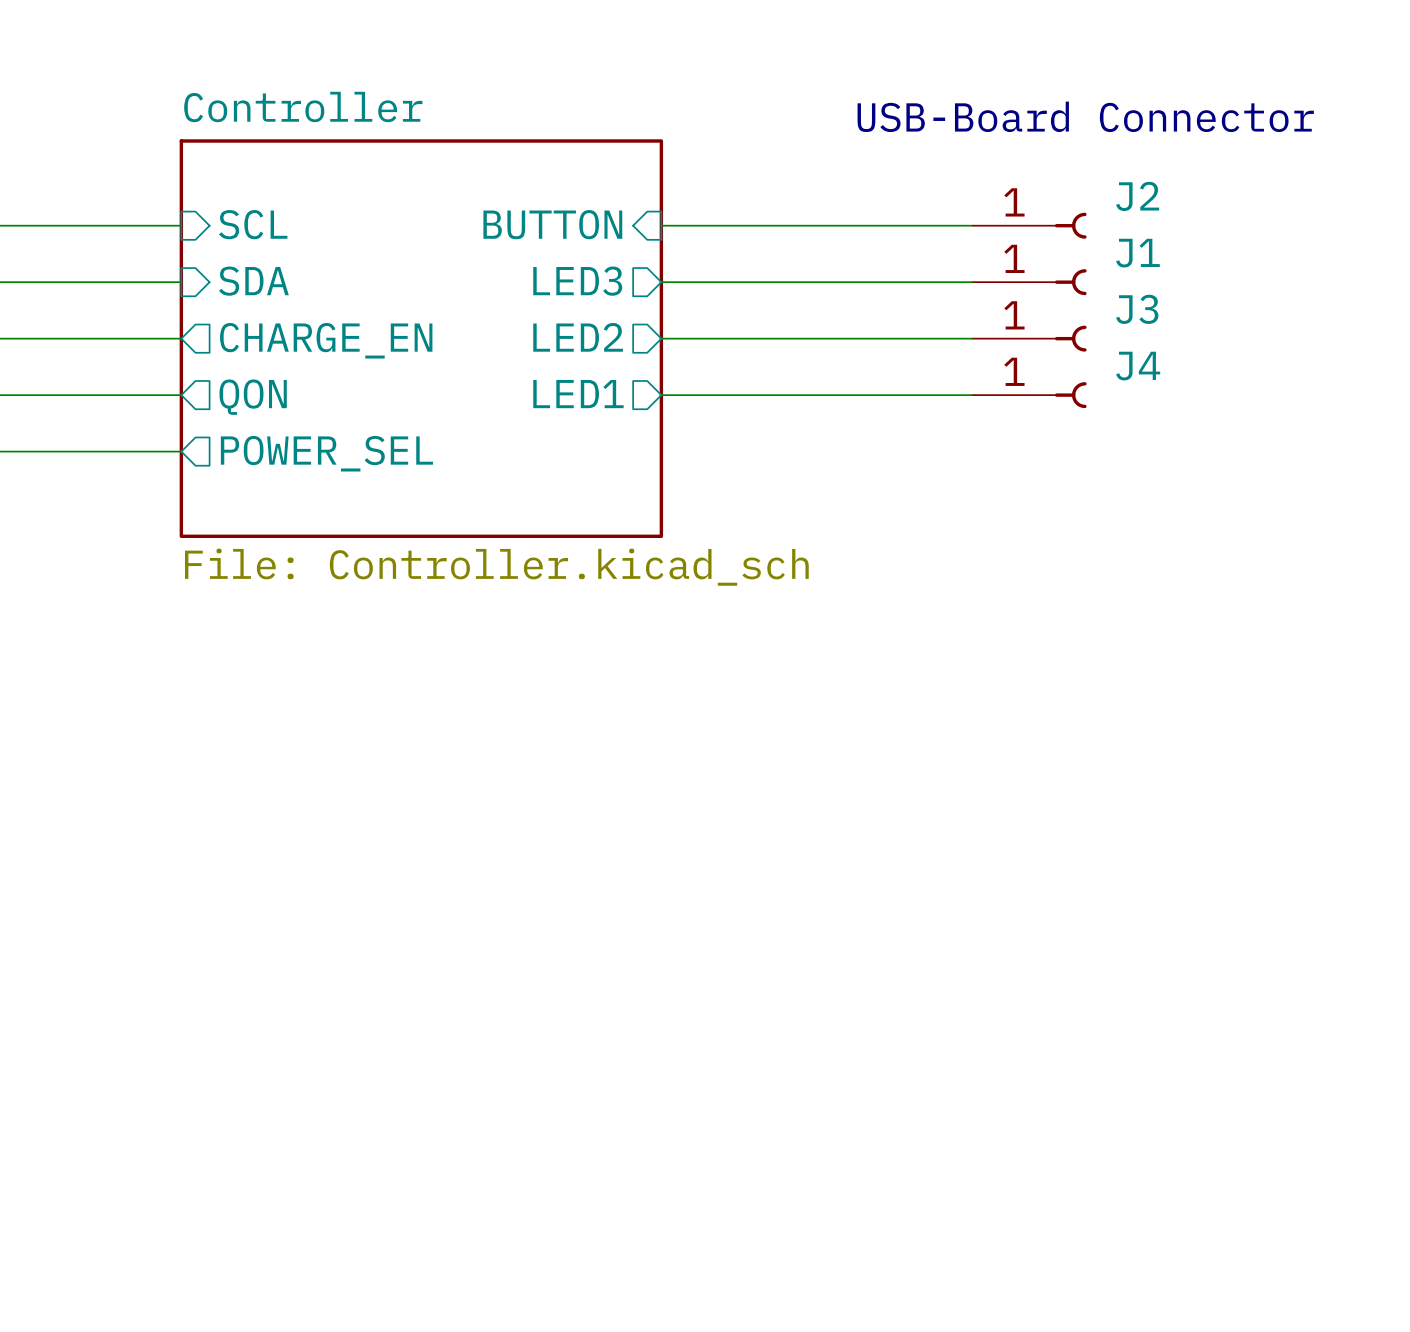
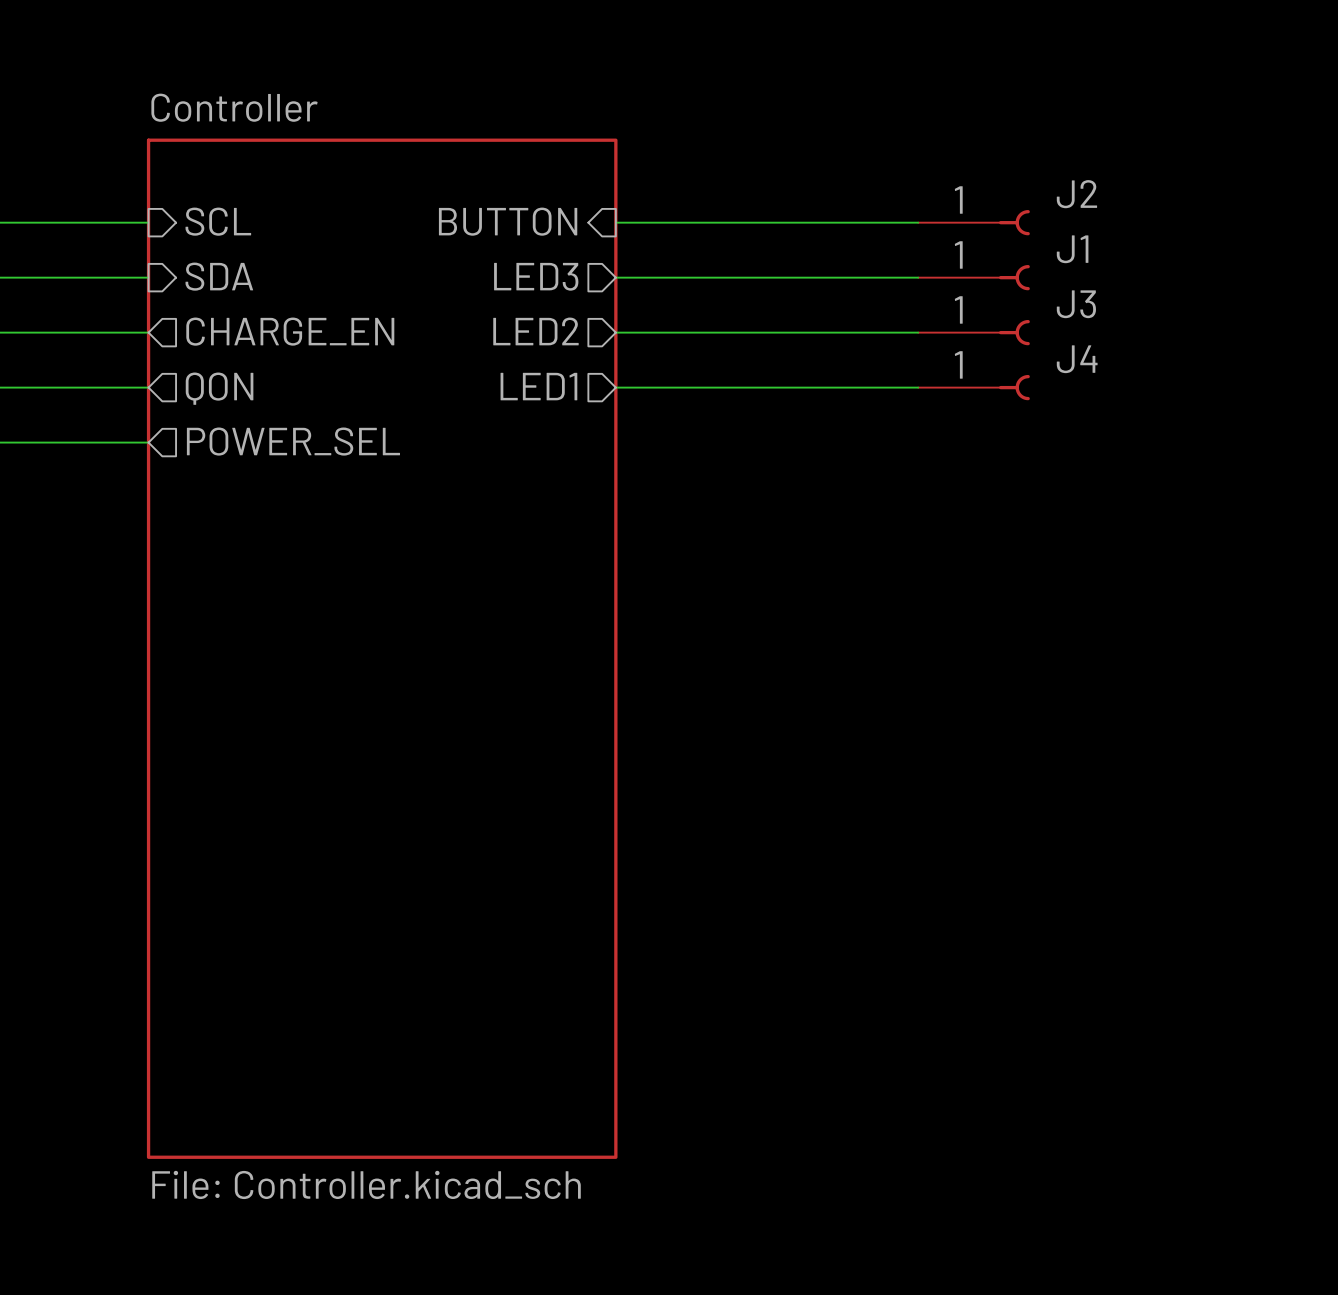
text: USB-Board Connector (1085, 116) -> none
sheet Controller: File: Controller.kicad_sch (421, 338) -> none
sheet Controller: none -> File: Controller.kicad_sch (382, 648)

